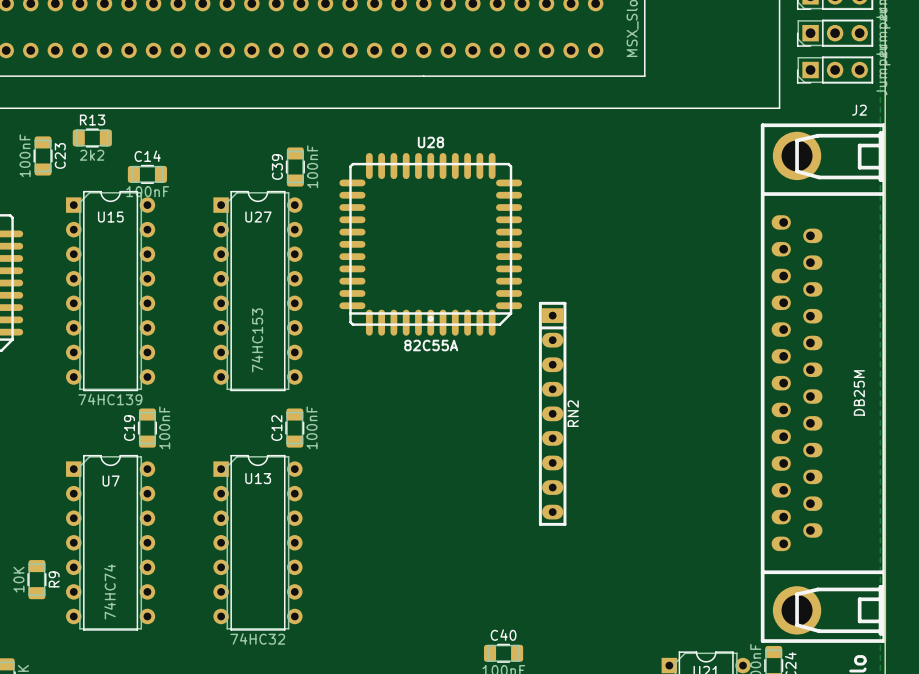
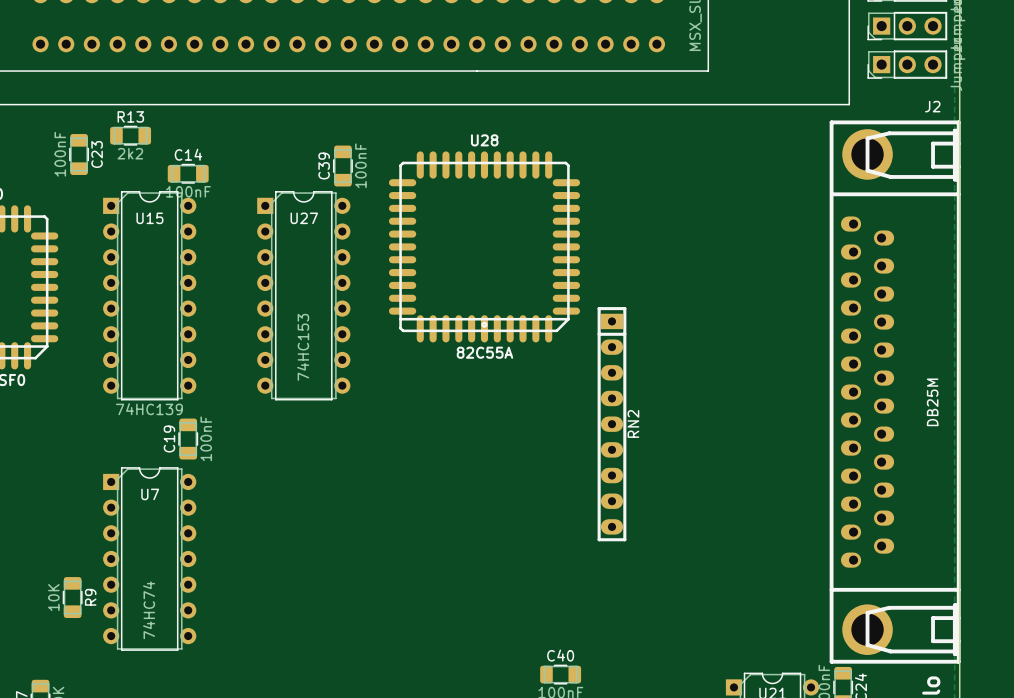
C12: 100nF (294, 428) -> none
U13: 74HC32 (257, 542) -> none

